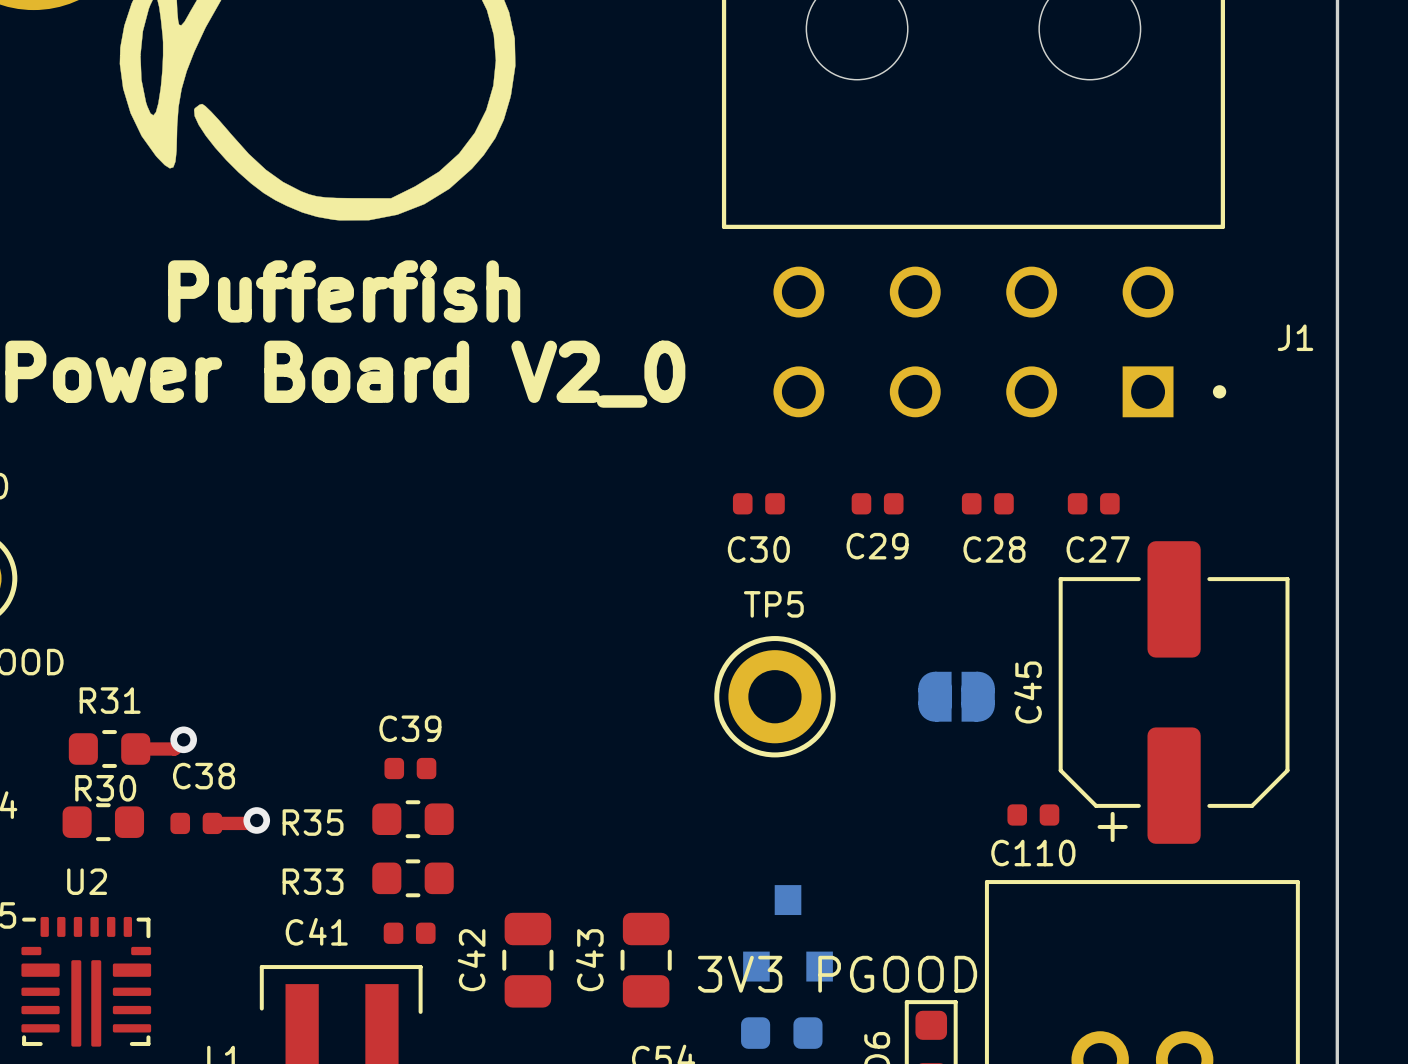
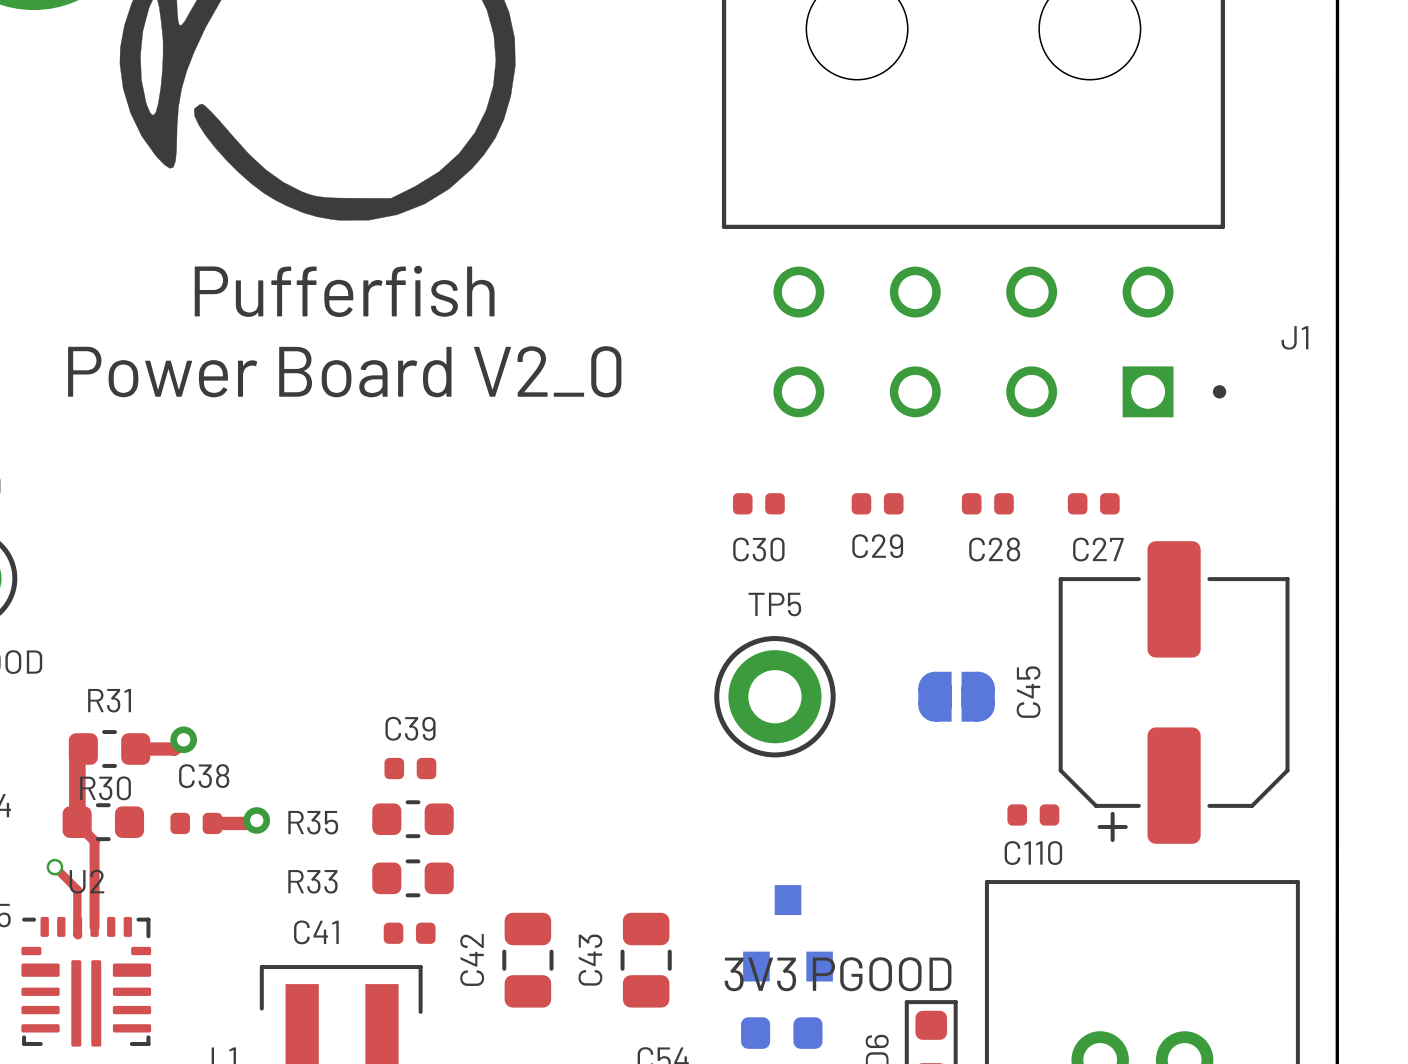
top track: none -> (83, 749) (77, 756) (77, 827)
top track: none -> (77, 823) (94, 841) (94, 926)
top track: none -> (54, 867) (77, 889) (78, 935)
via: none -> (54, 867)

